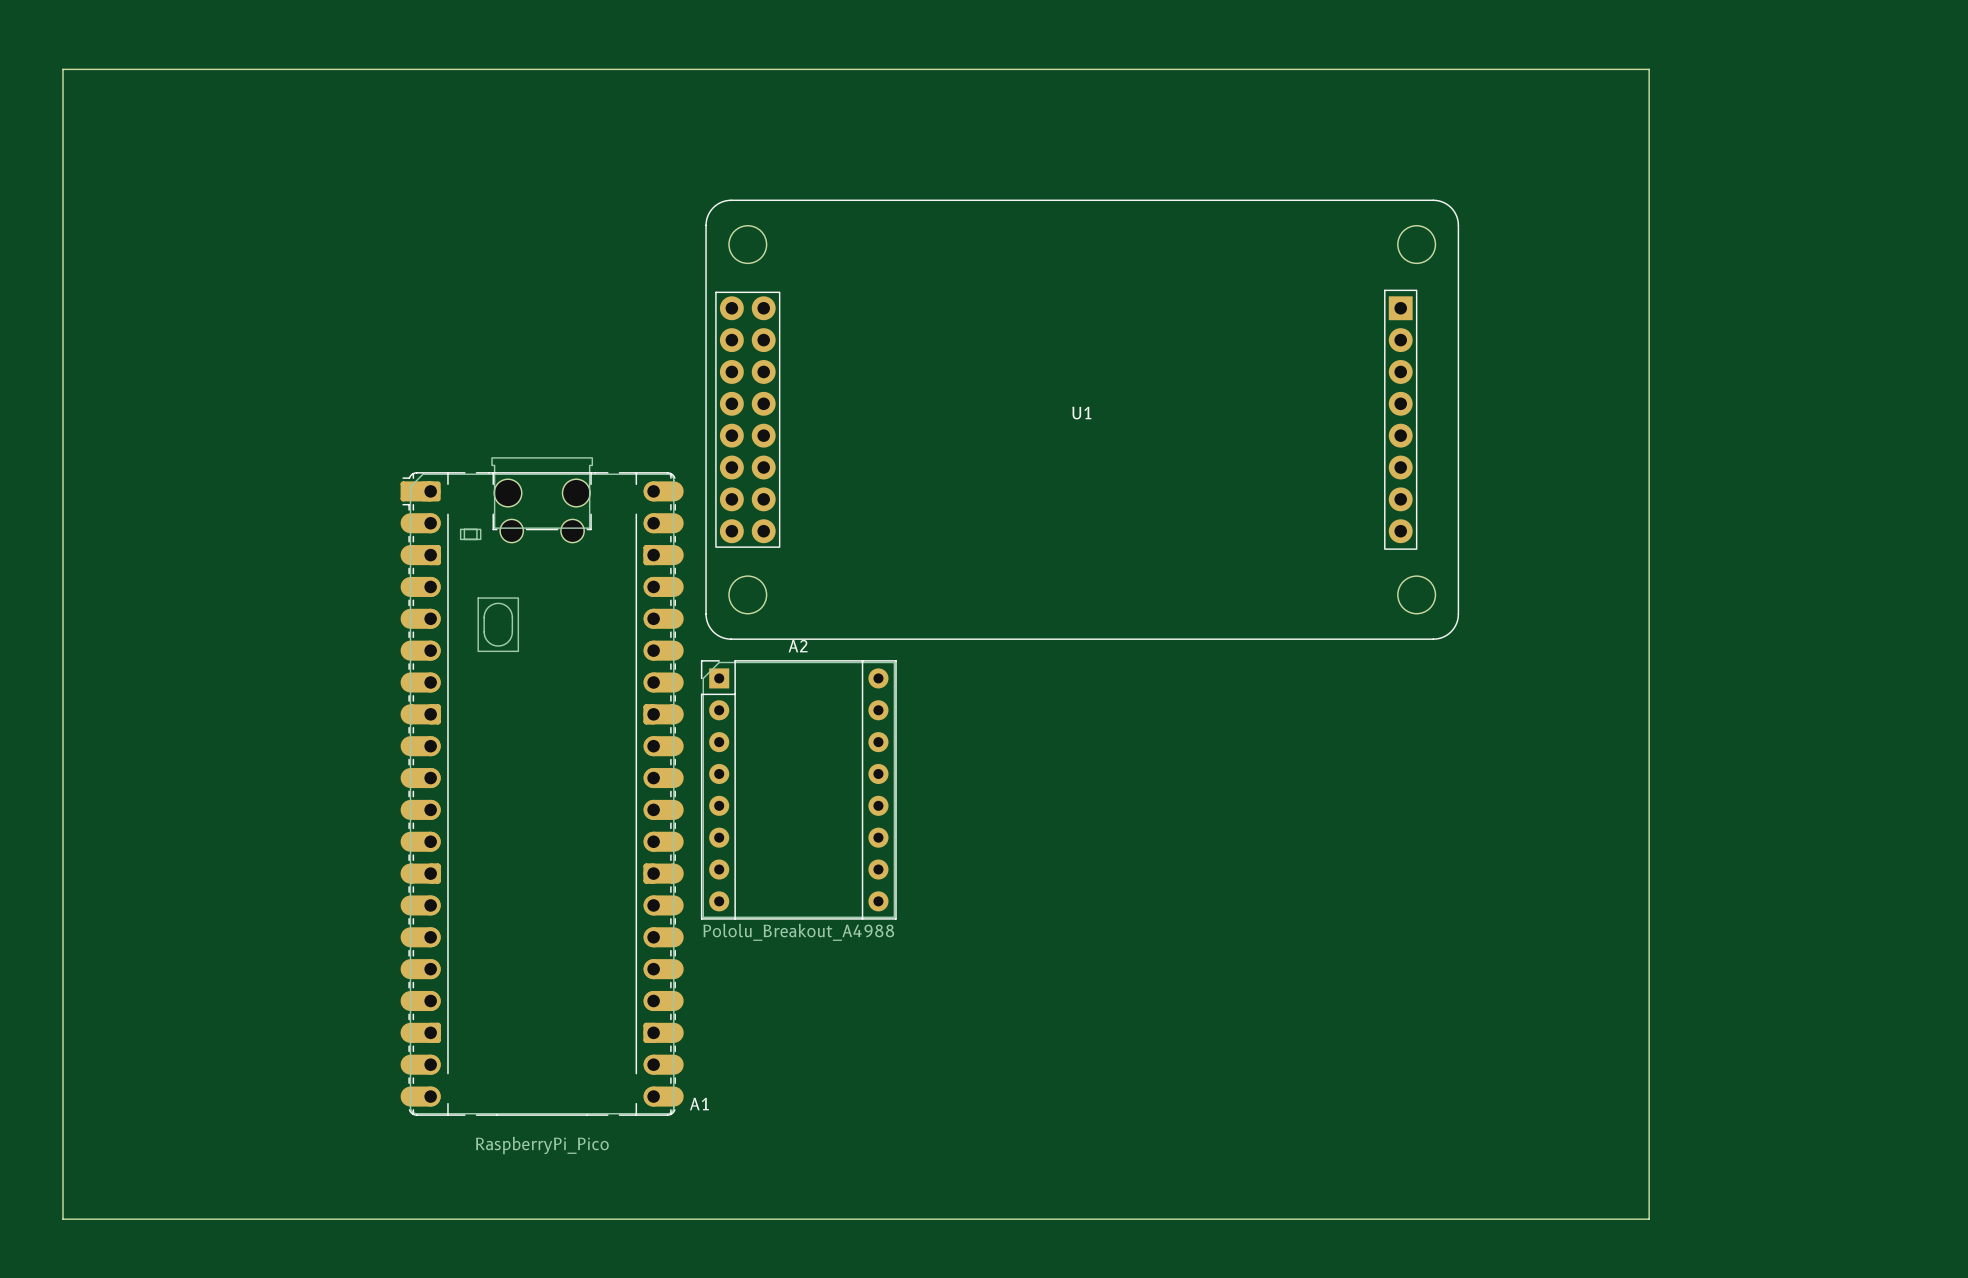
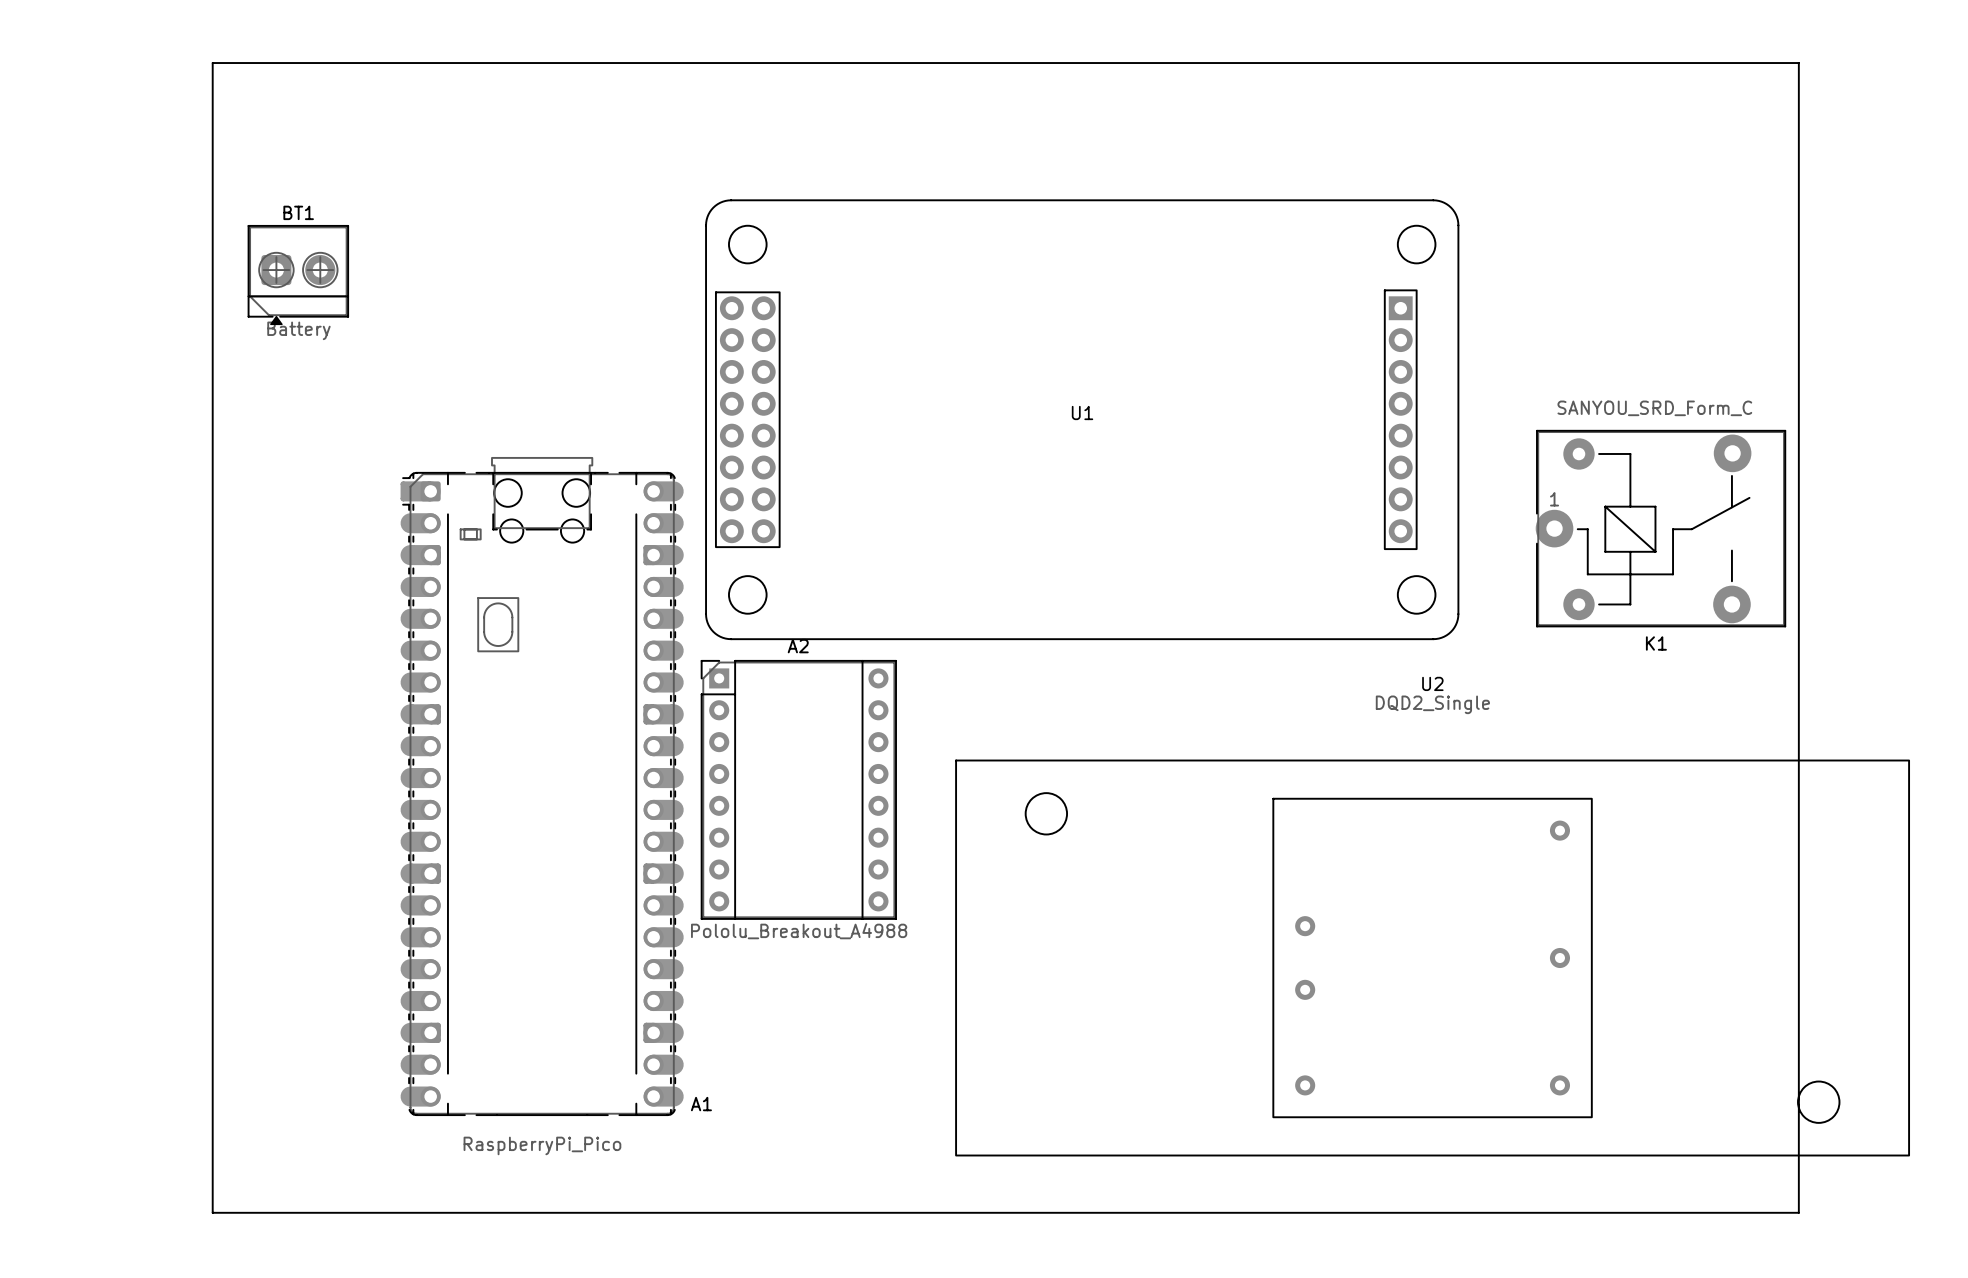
board edge: (63, 69) (1649, 69) (1649, 1219) (63, 1219) (63, 69) -> (212, 63) (1798, 63) (1798, 1212) (212, 1212) (212, 63)
BT1: none -> Battery (298, 275)
K1: none -> SANYOU_SRD_Form_C (1660, 528)
U2: none -> DQD2_Single (1432, 958)

